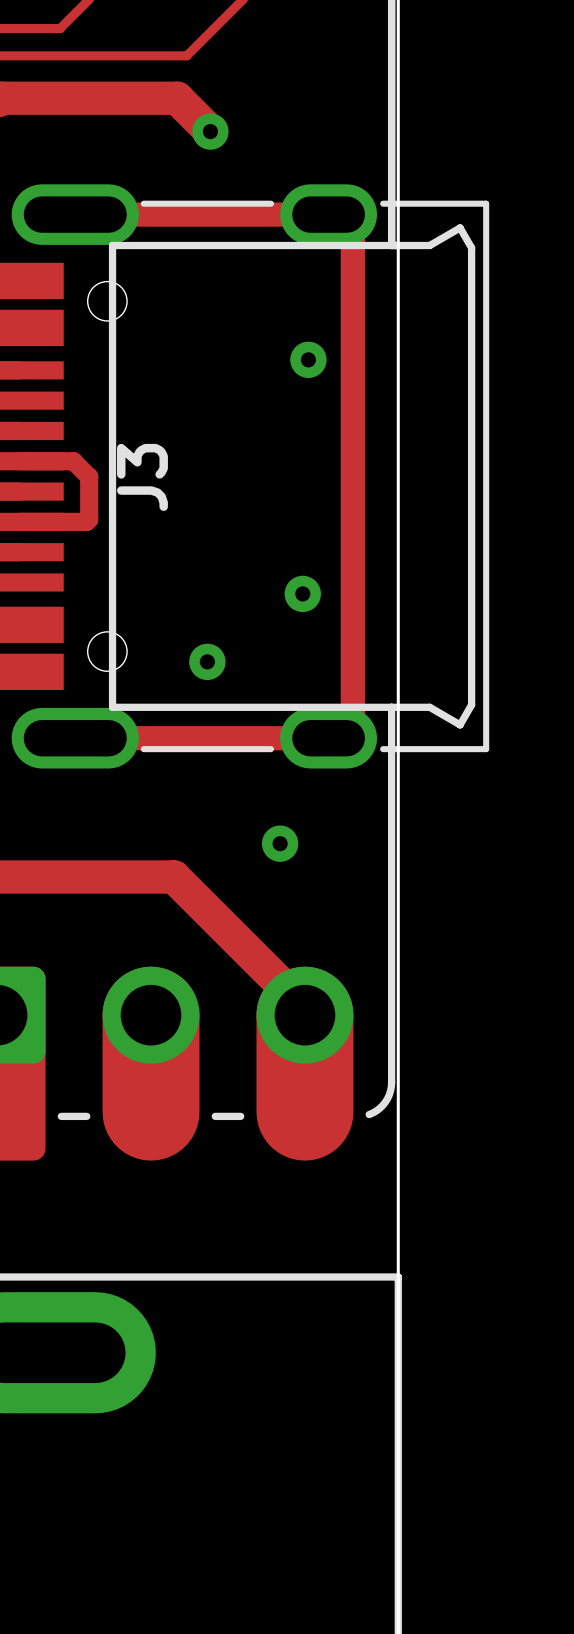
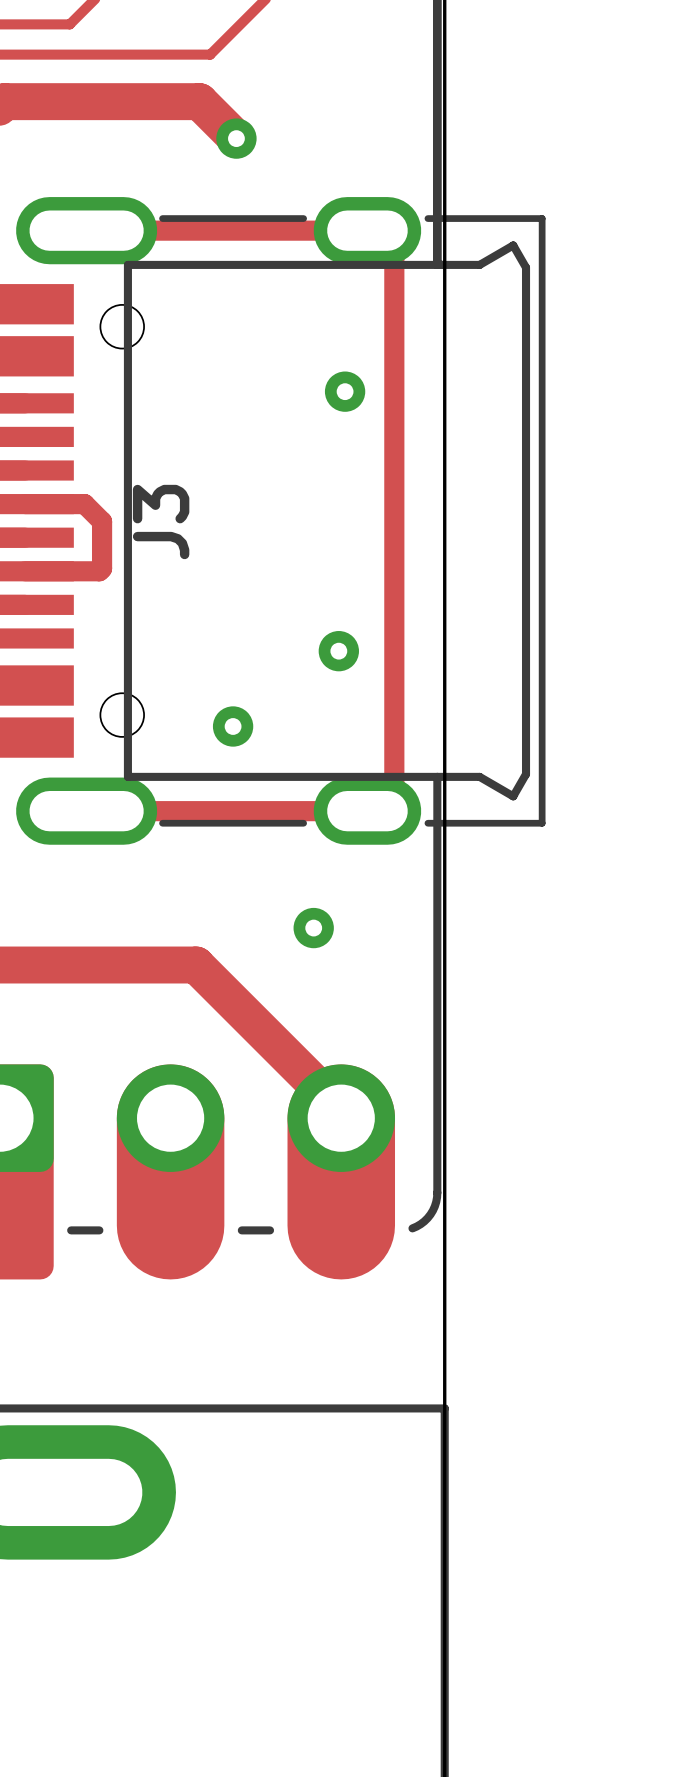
track width: thick (75, 214) (328, 214) (352, 238) (352, 713) (328, 738) (75, 738) -> thin (86, 230) (367, 230) (394, 257) (394, 784) (367, 811) (86, 811)

